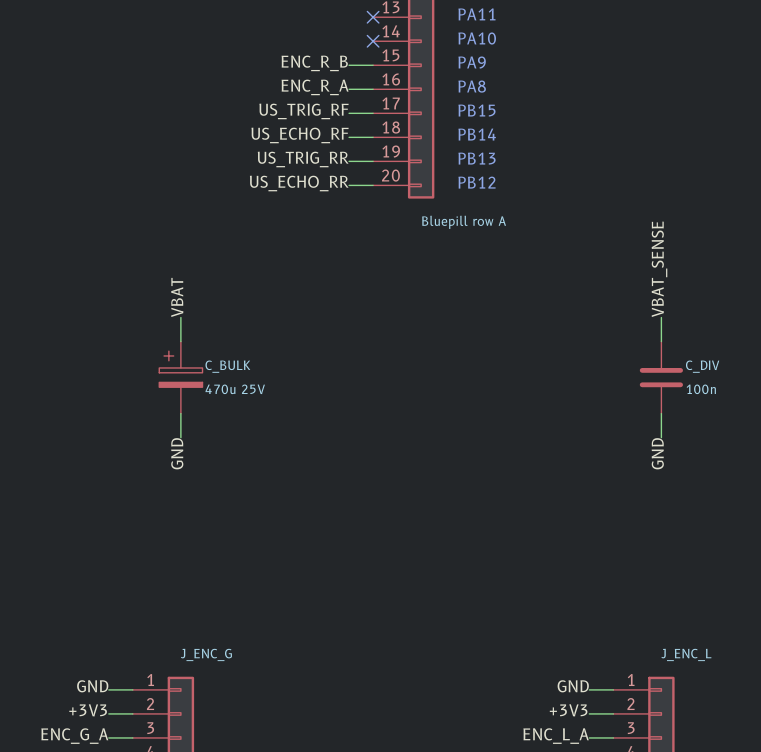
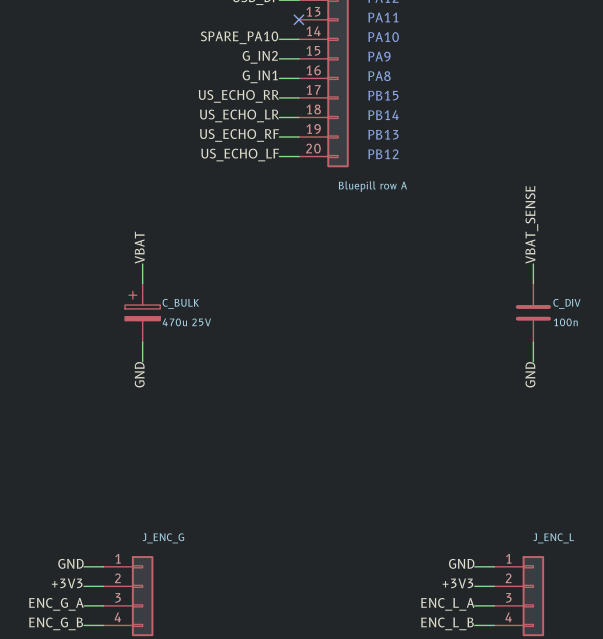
label: none -> SPARE_PA10 (239, 37)
wire: none -> (279, 39) (298, 39)
no-connect mark: (373, 41) -> none
label: ENC_R_B (314, 63) -> G_IN2 (260, 57)
label: ENC_R_A (315, 87) -> G_IN1 (260, 76)
label: US_TRIG_RF (304, 111) -> US_ECHO_RR (238, 96)
label: US_ECHO_RF (300, 135) -> US_ECHO_LR (239, 115)
label: US_TRIG_RR (303, 159) -> US_ECHO_RF (239, 135)
label: US_ECHO_RR (299, 183) -> US_ECHO_LF (240, 155)

